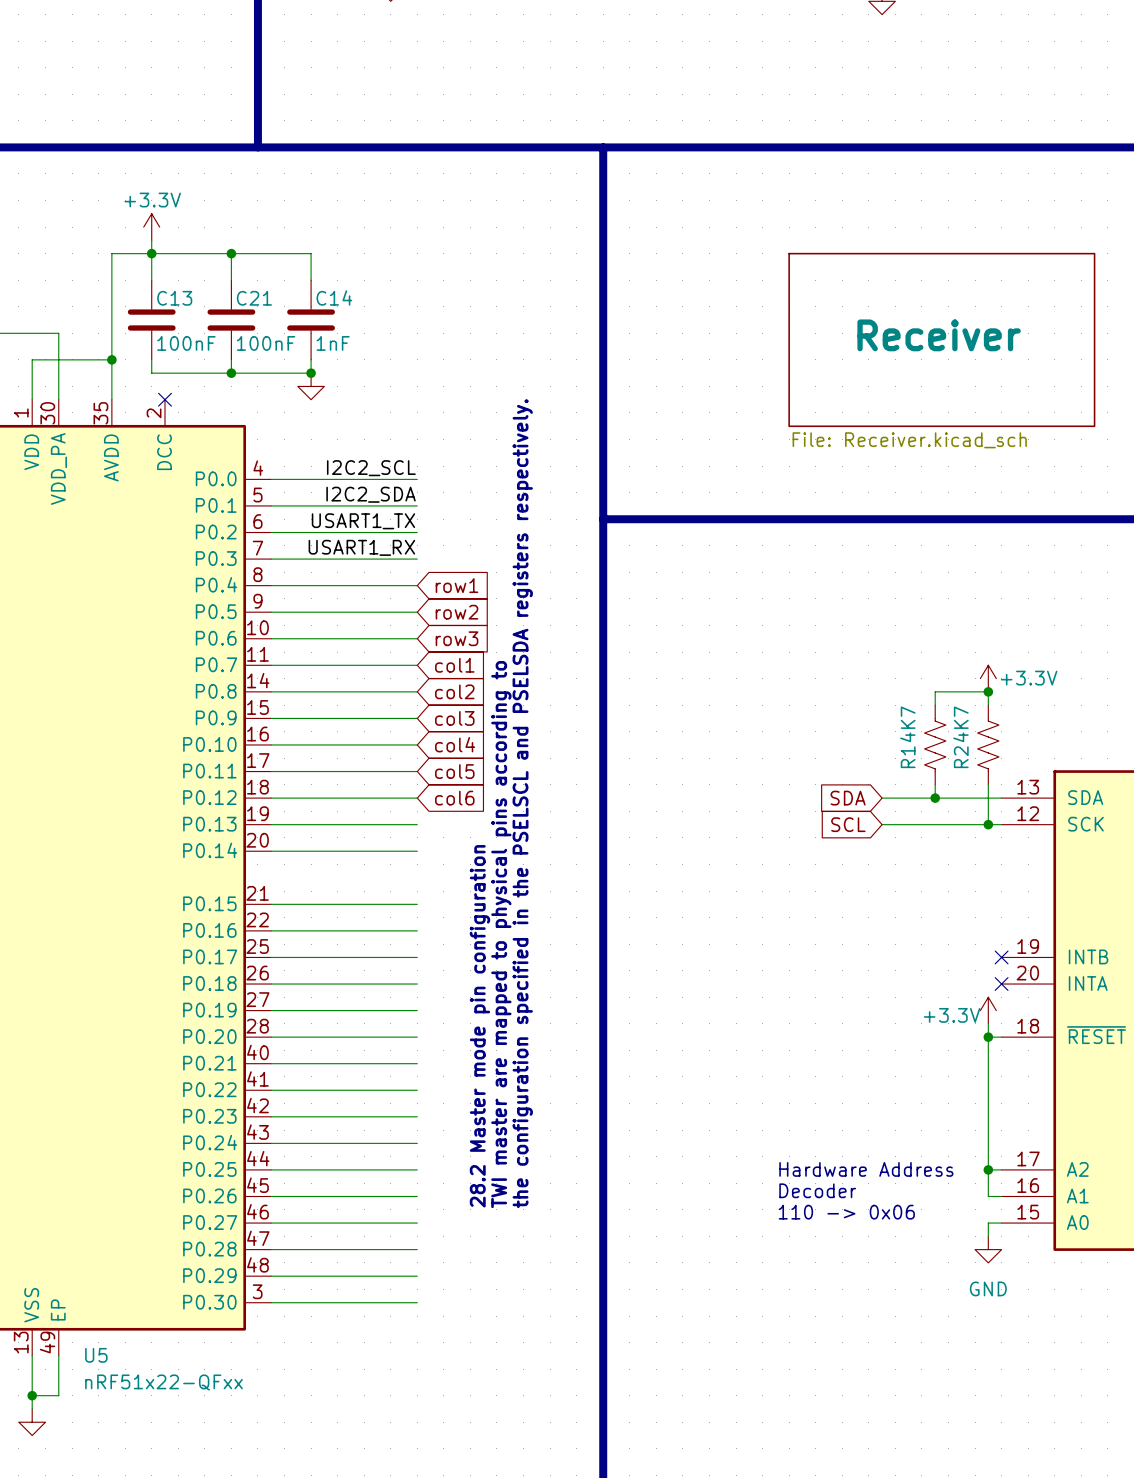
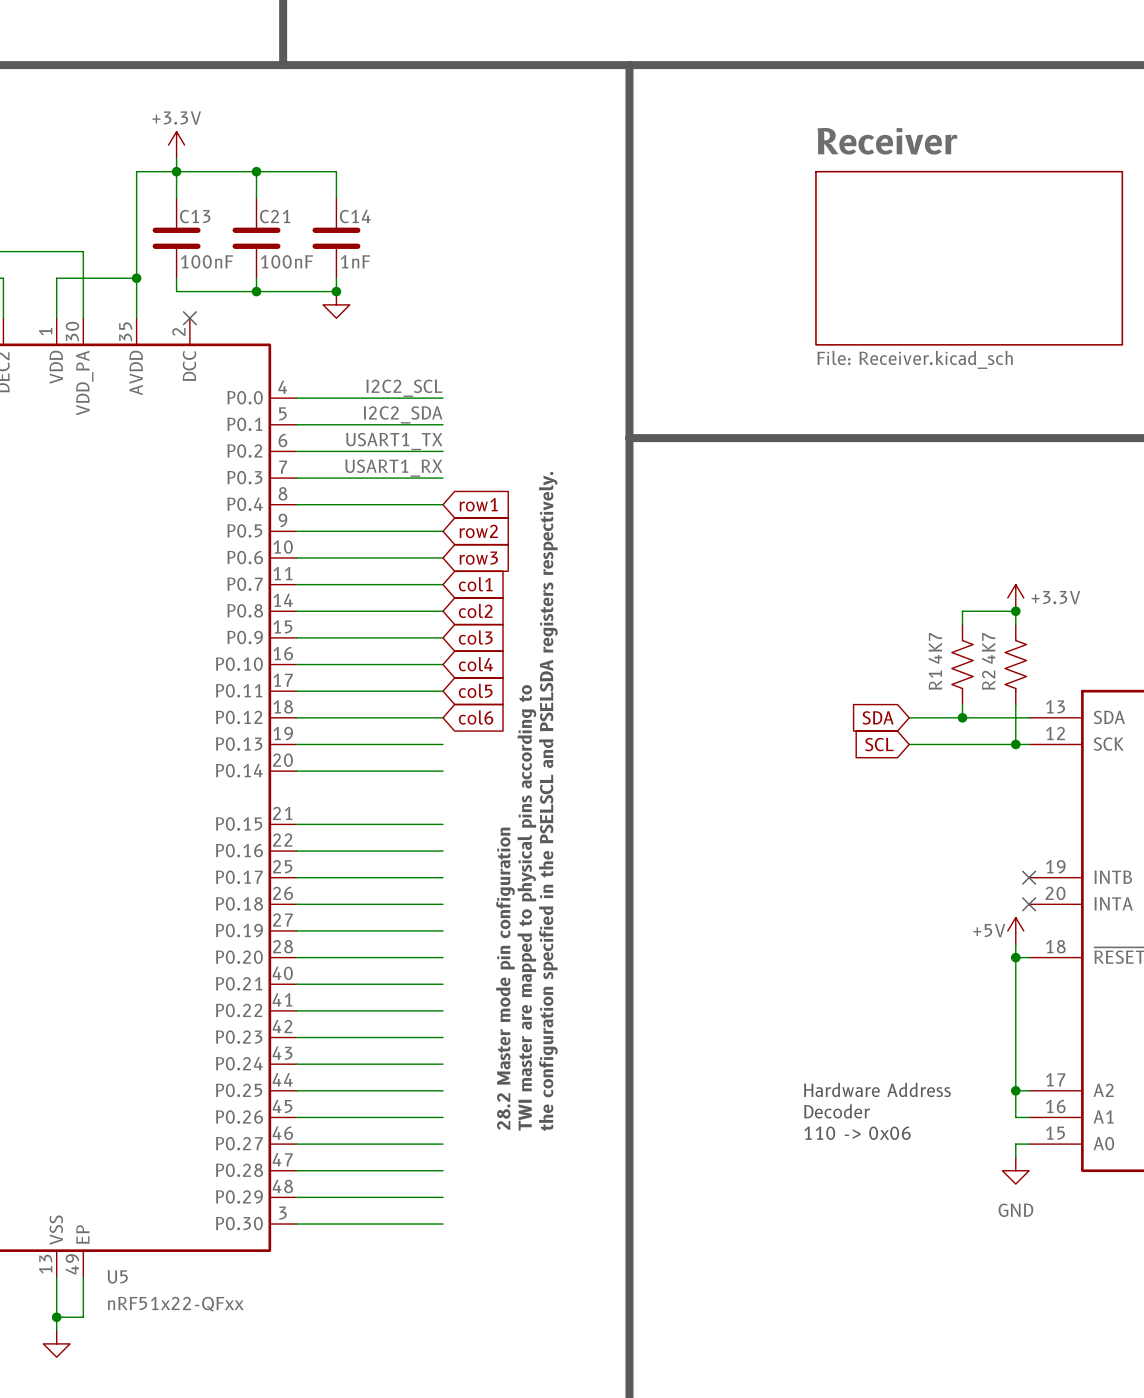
sheet Receiver name position: Receiver (939, 335) -> Receiver (887, 141)
power symbol: +3.3V (988, 1010) -> +5V (1015, 930)

